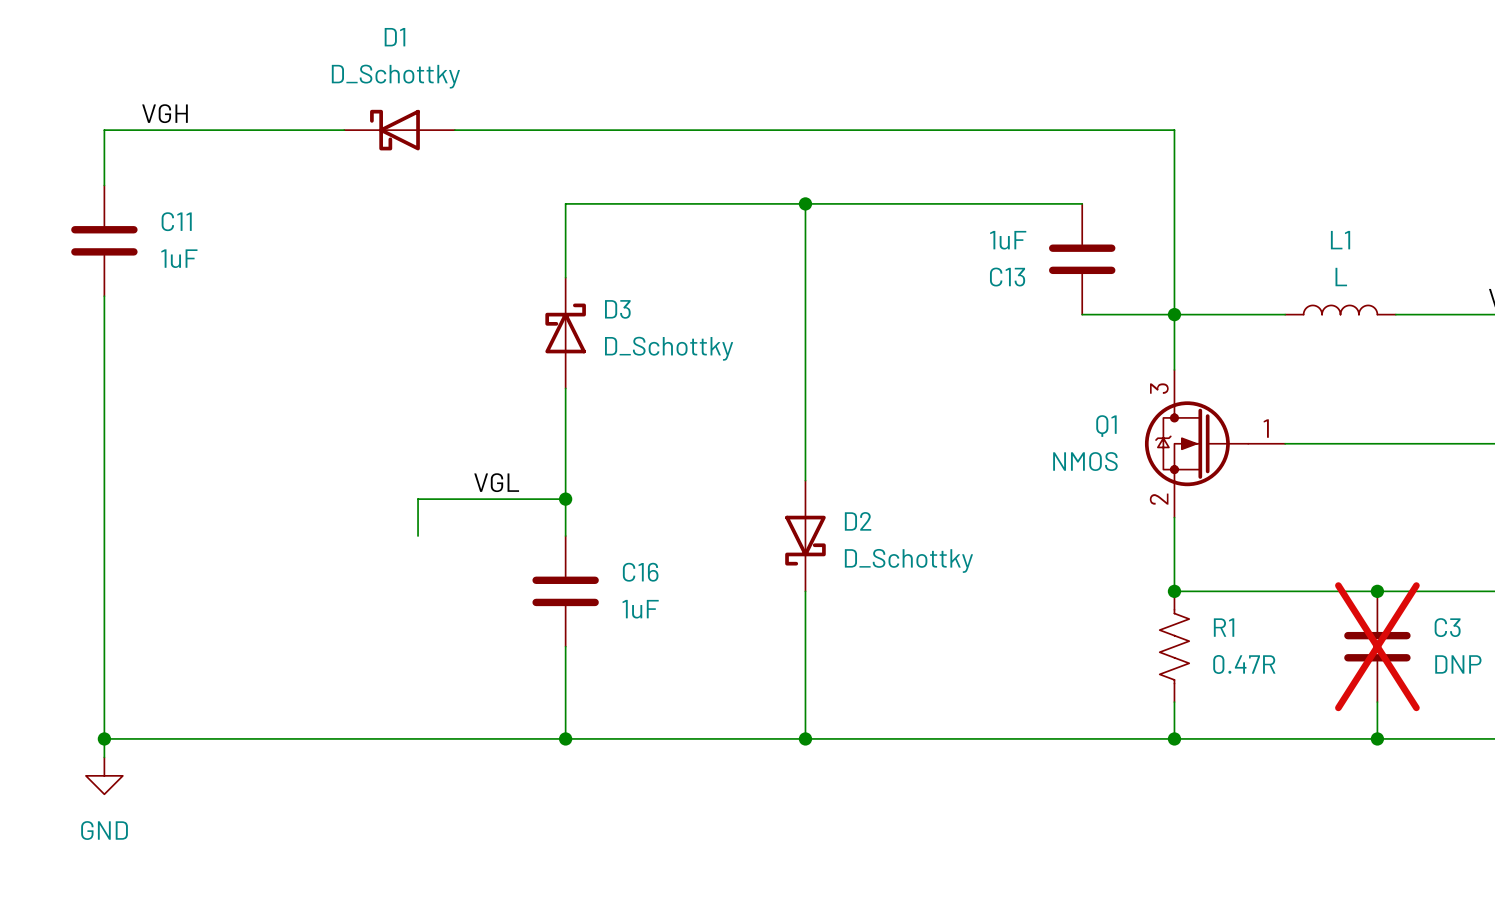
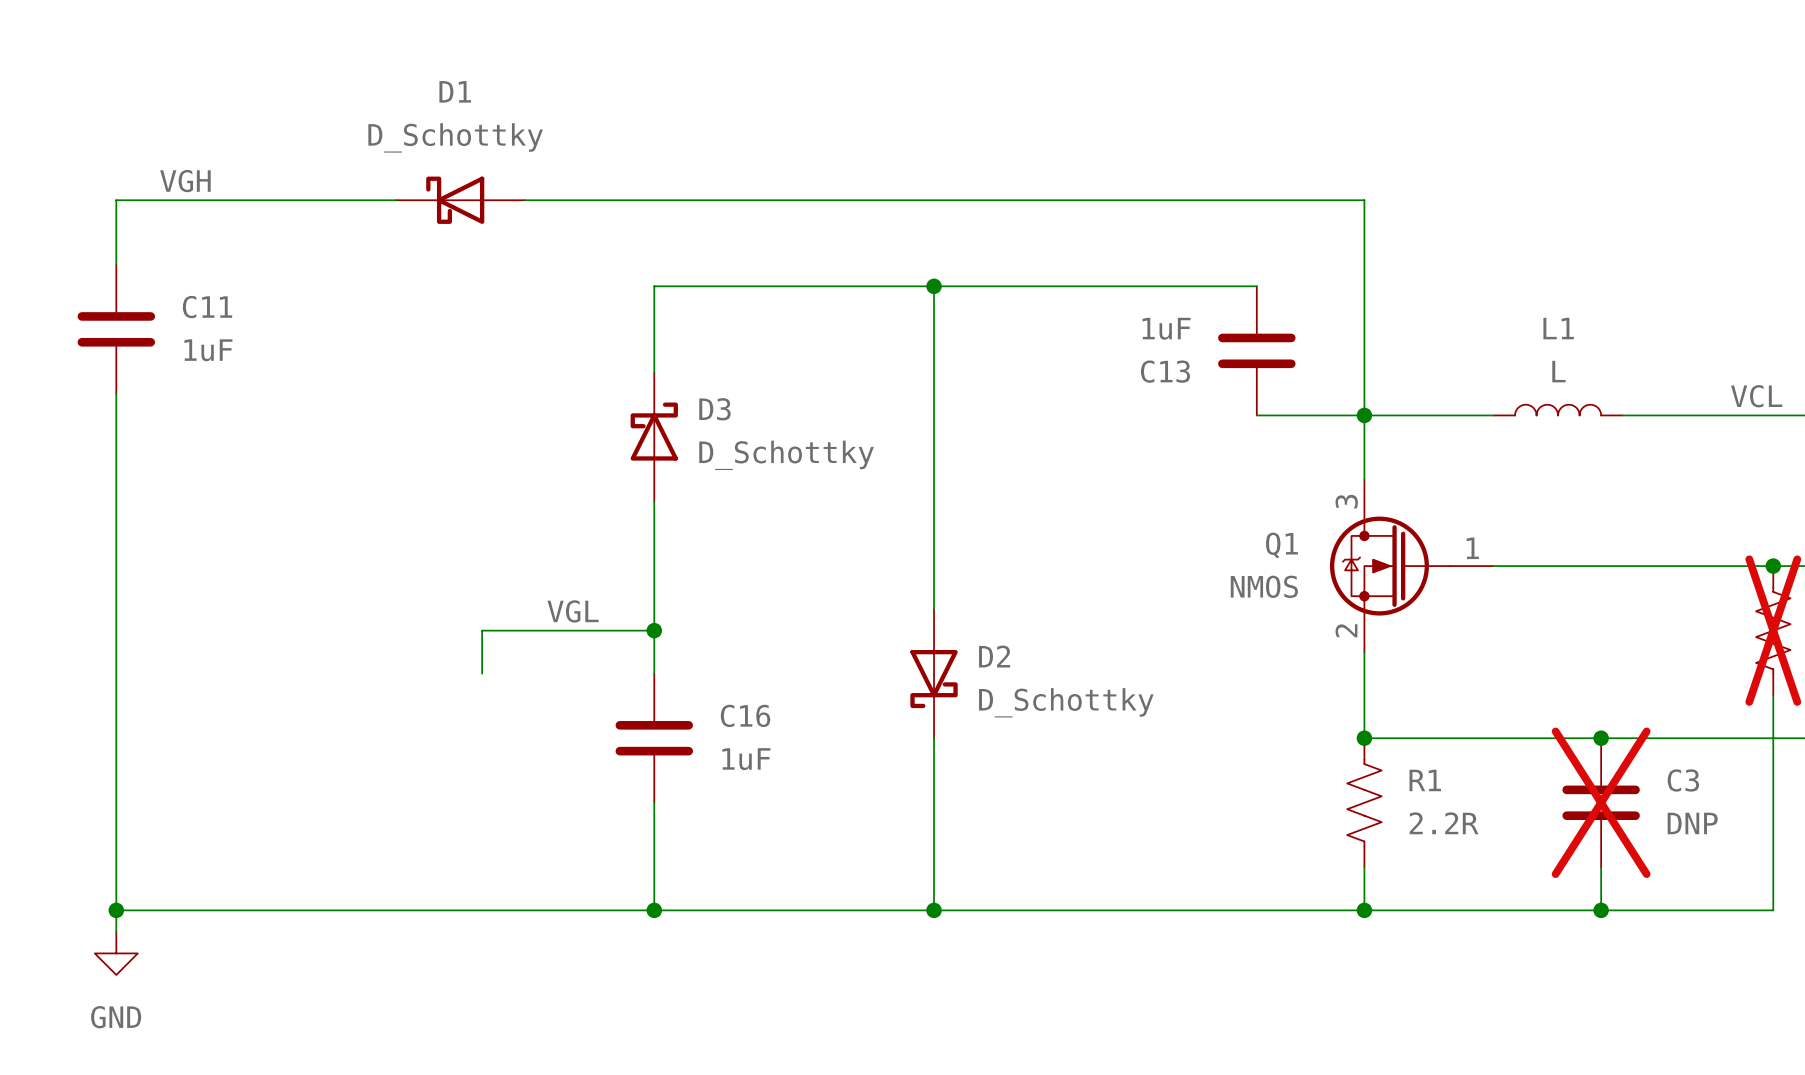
R1 value: 0.47R (1244, 664) -> 2.2R (1444, 823)

